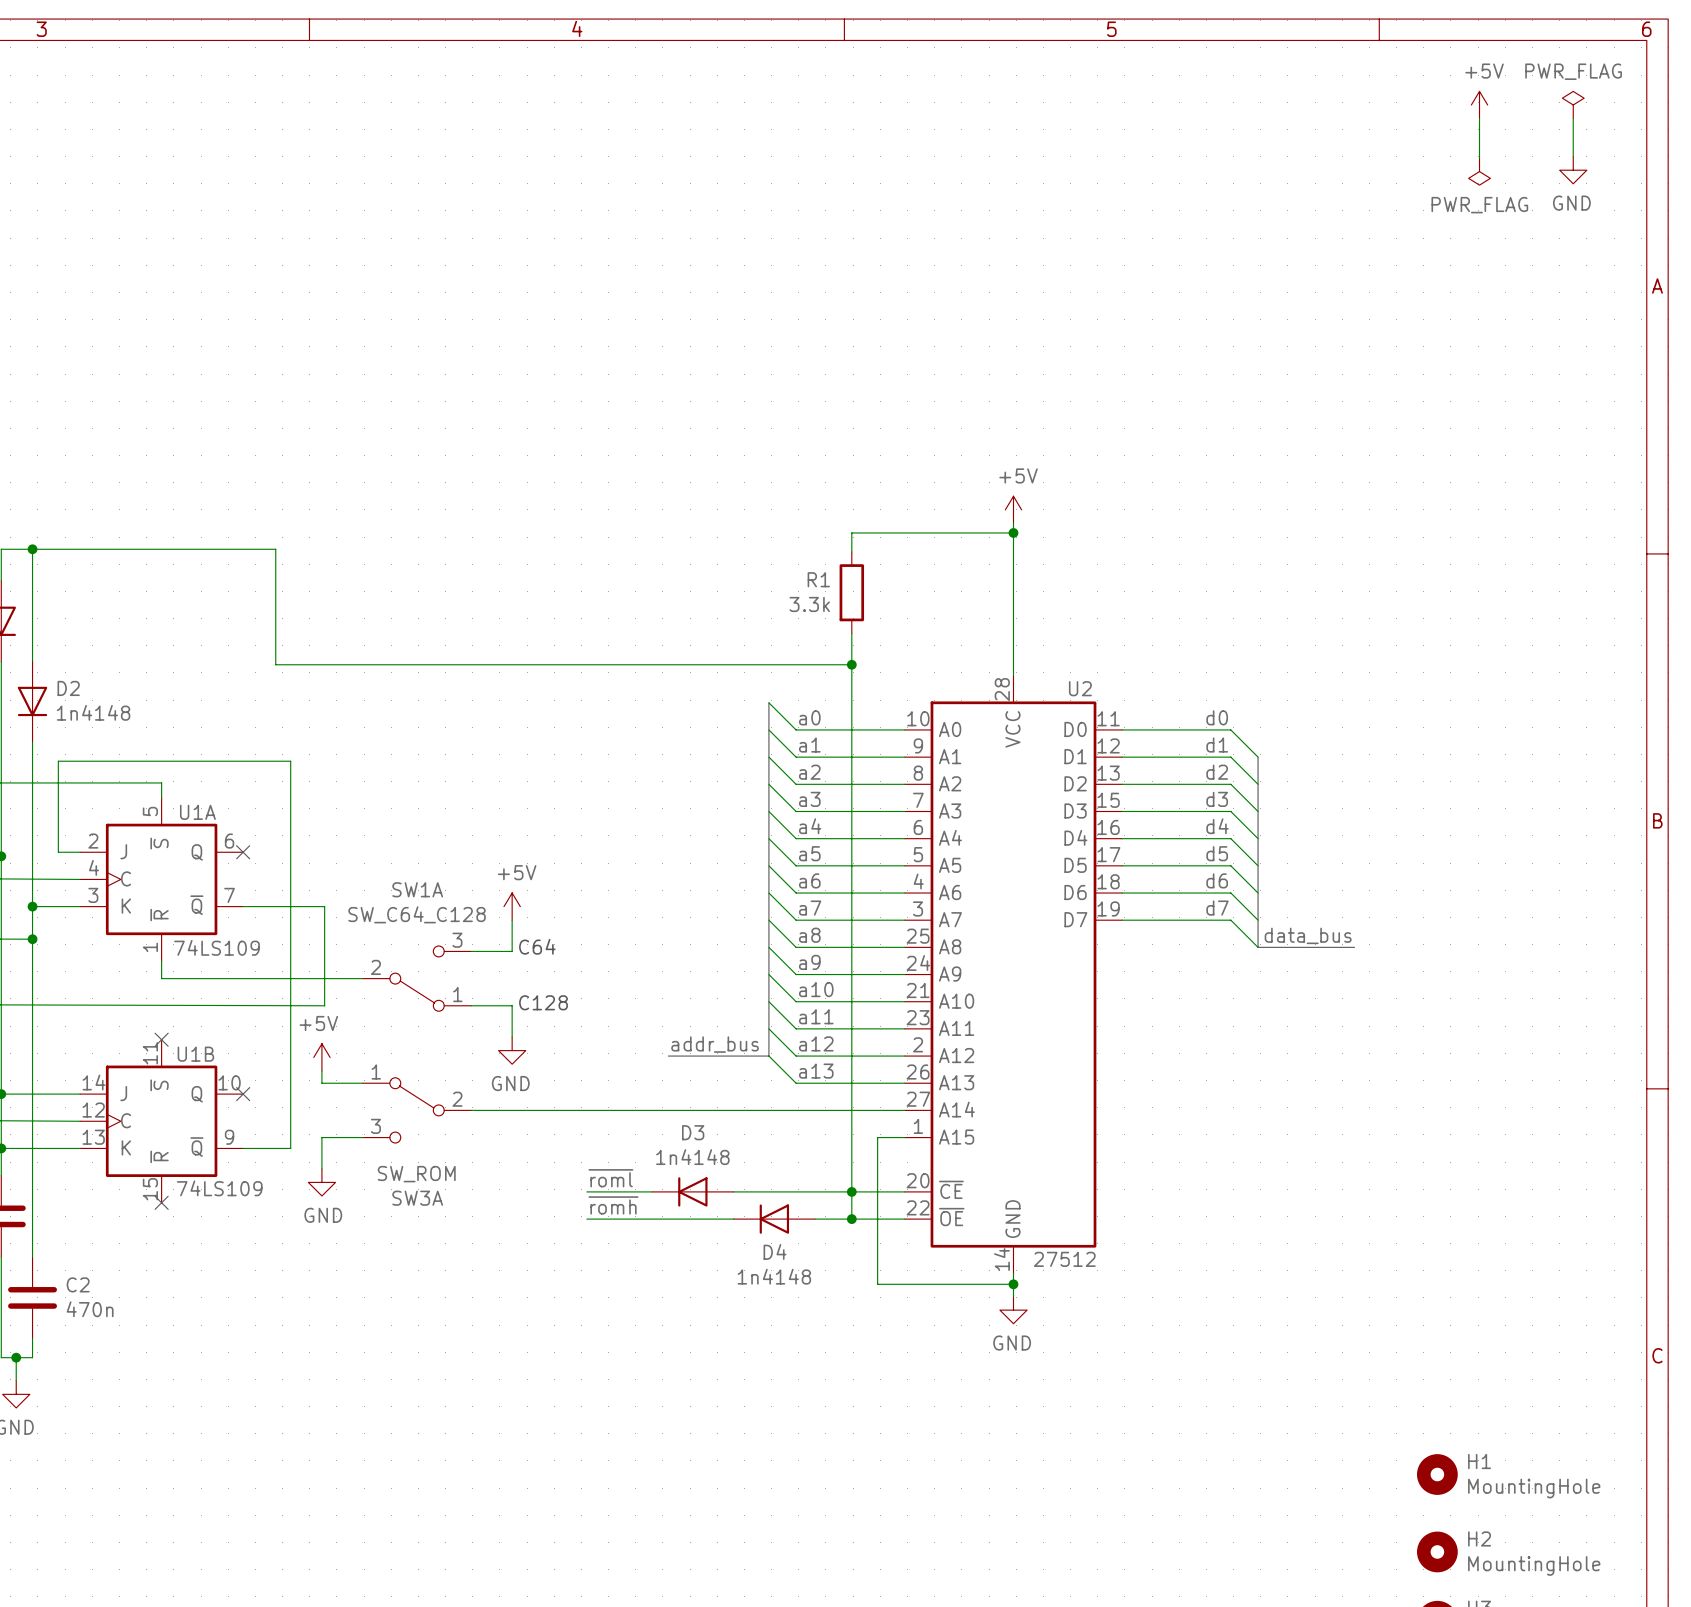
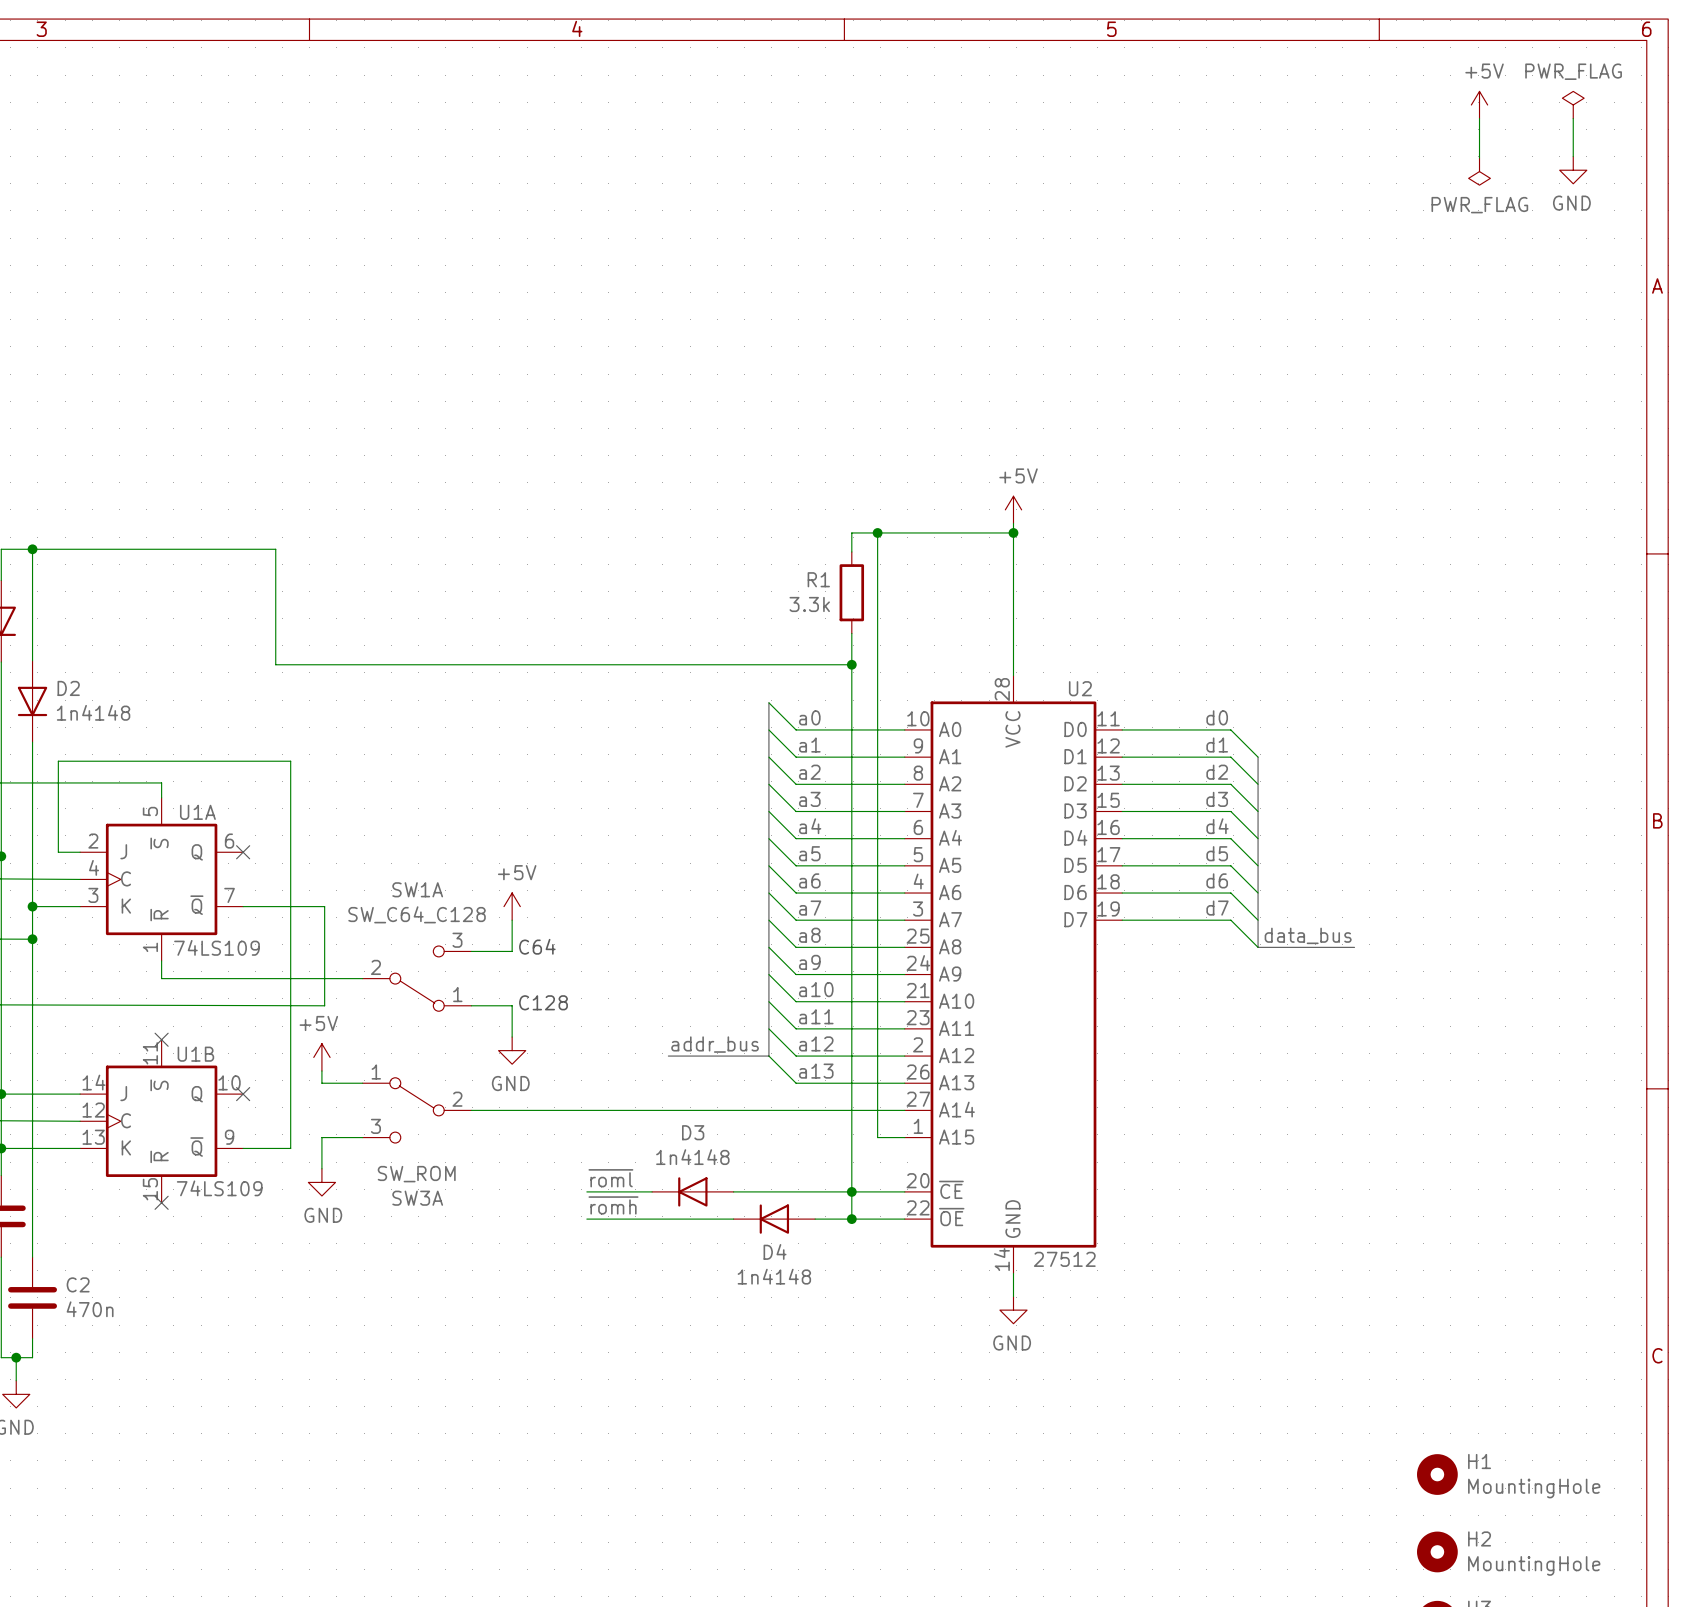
junction: none -> (877, 532)
wire: (877, 1137) (877, 1284) (1013, 1284) -> (877, 1137) (877, 532)
junction: (1013, 1284) -> none

